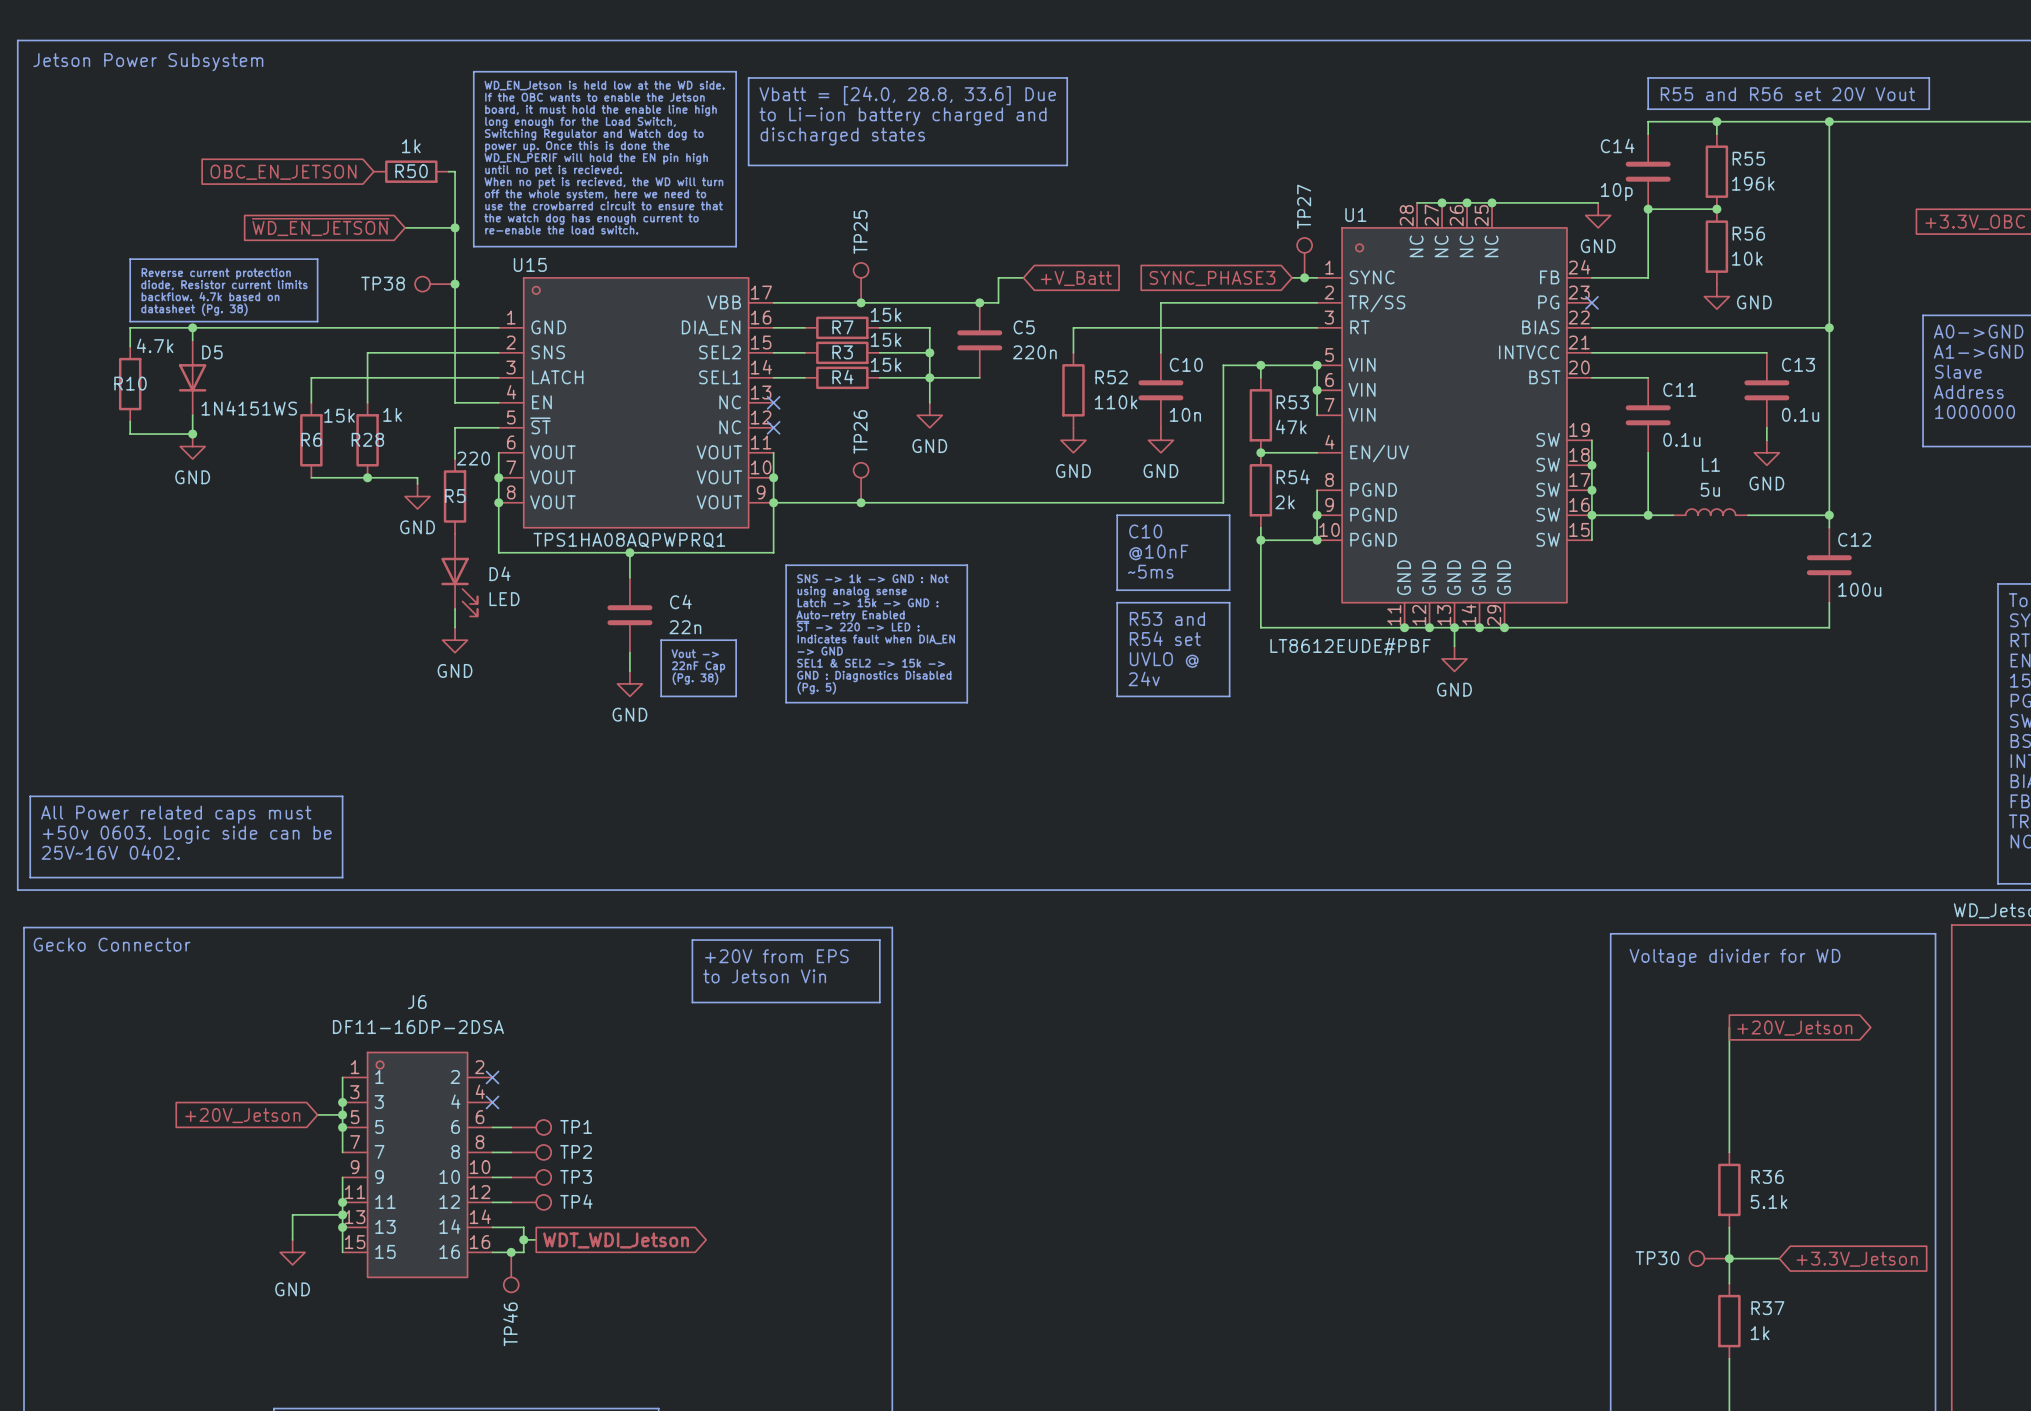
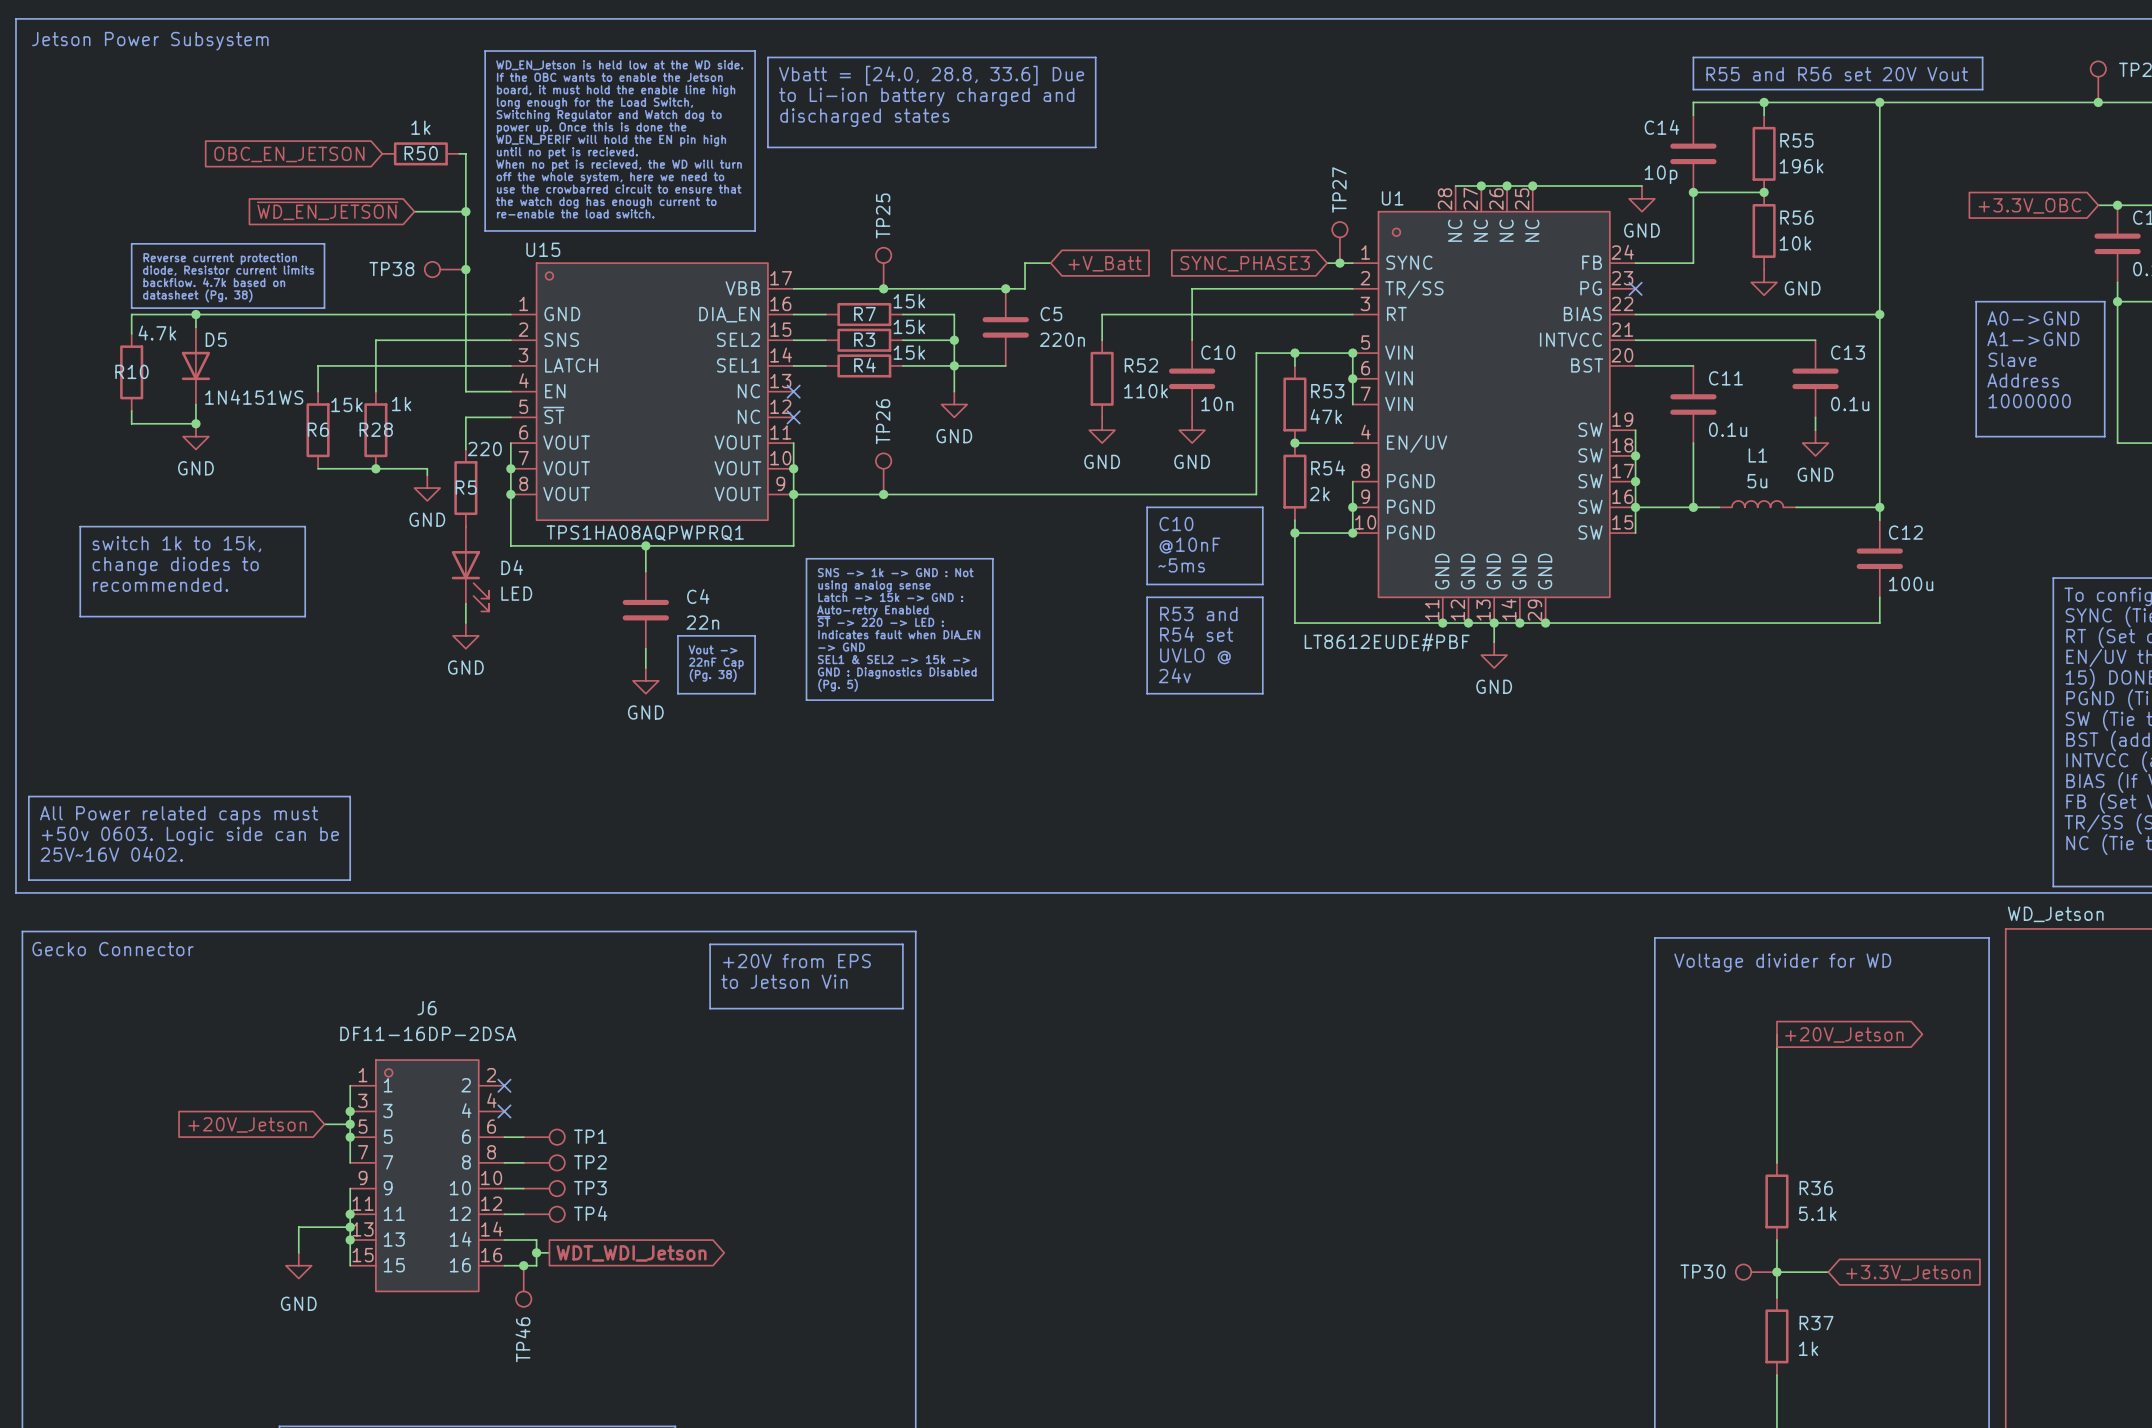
line: none -> (80, 526) (305, 526) (305, 616) (80, 616) (80, 526)
text: none -> switch 1k to 15k, (176, 544)
text: none -> change diodes to (175, 566)
text: none -> recommended. (160, 584)

